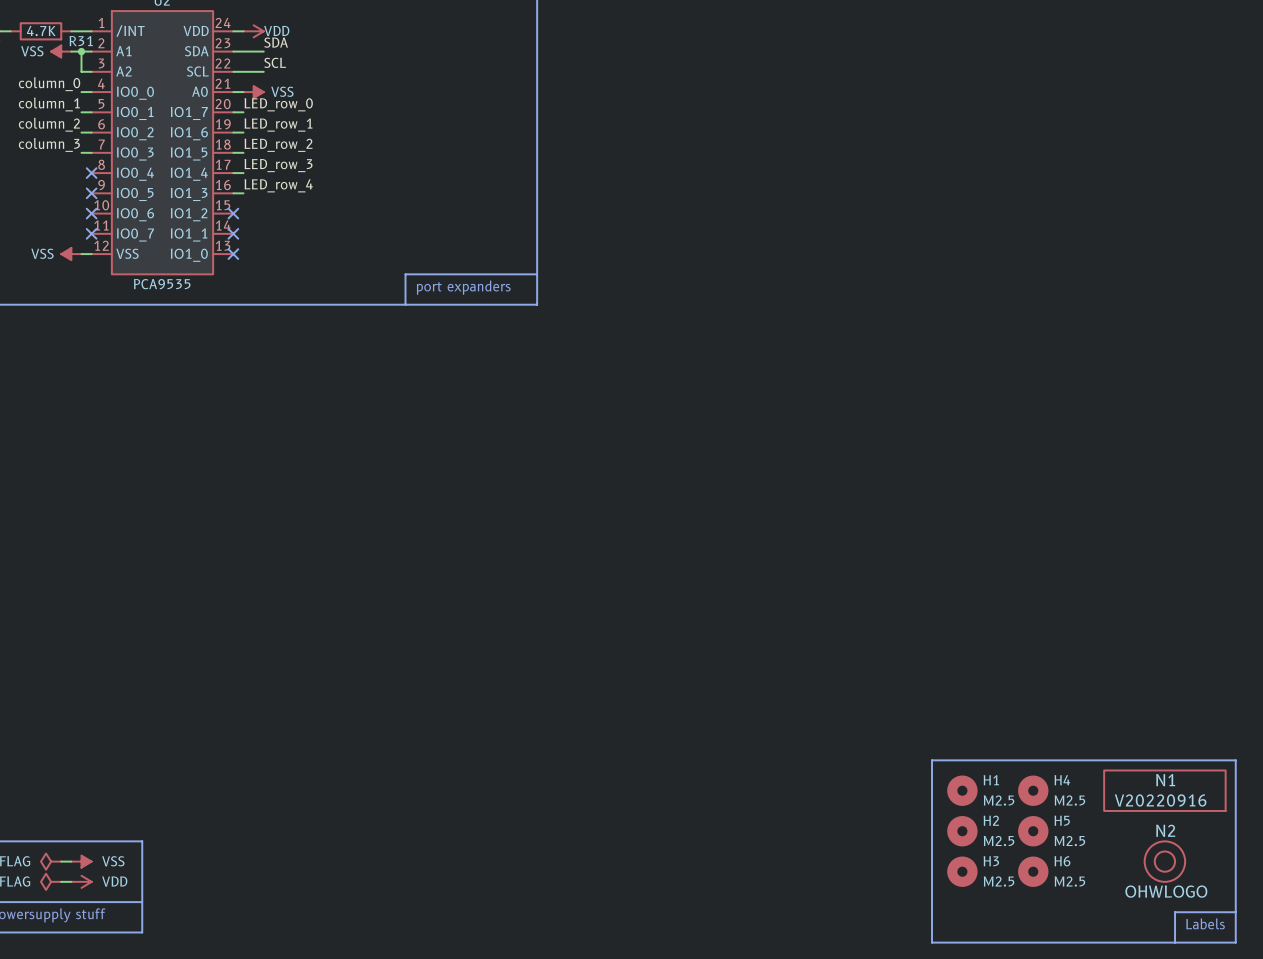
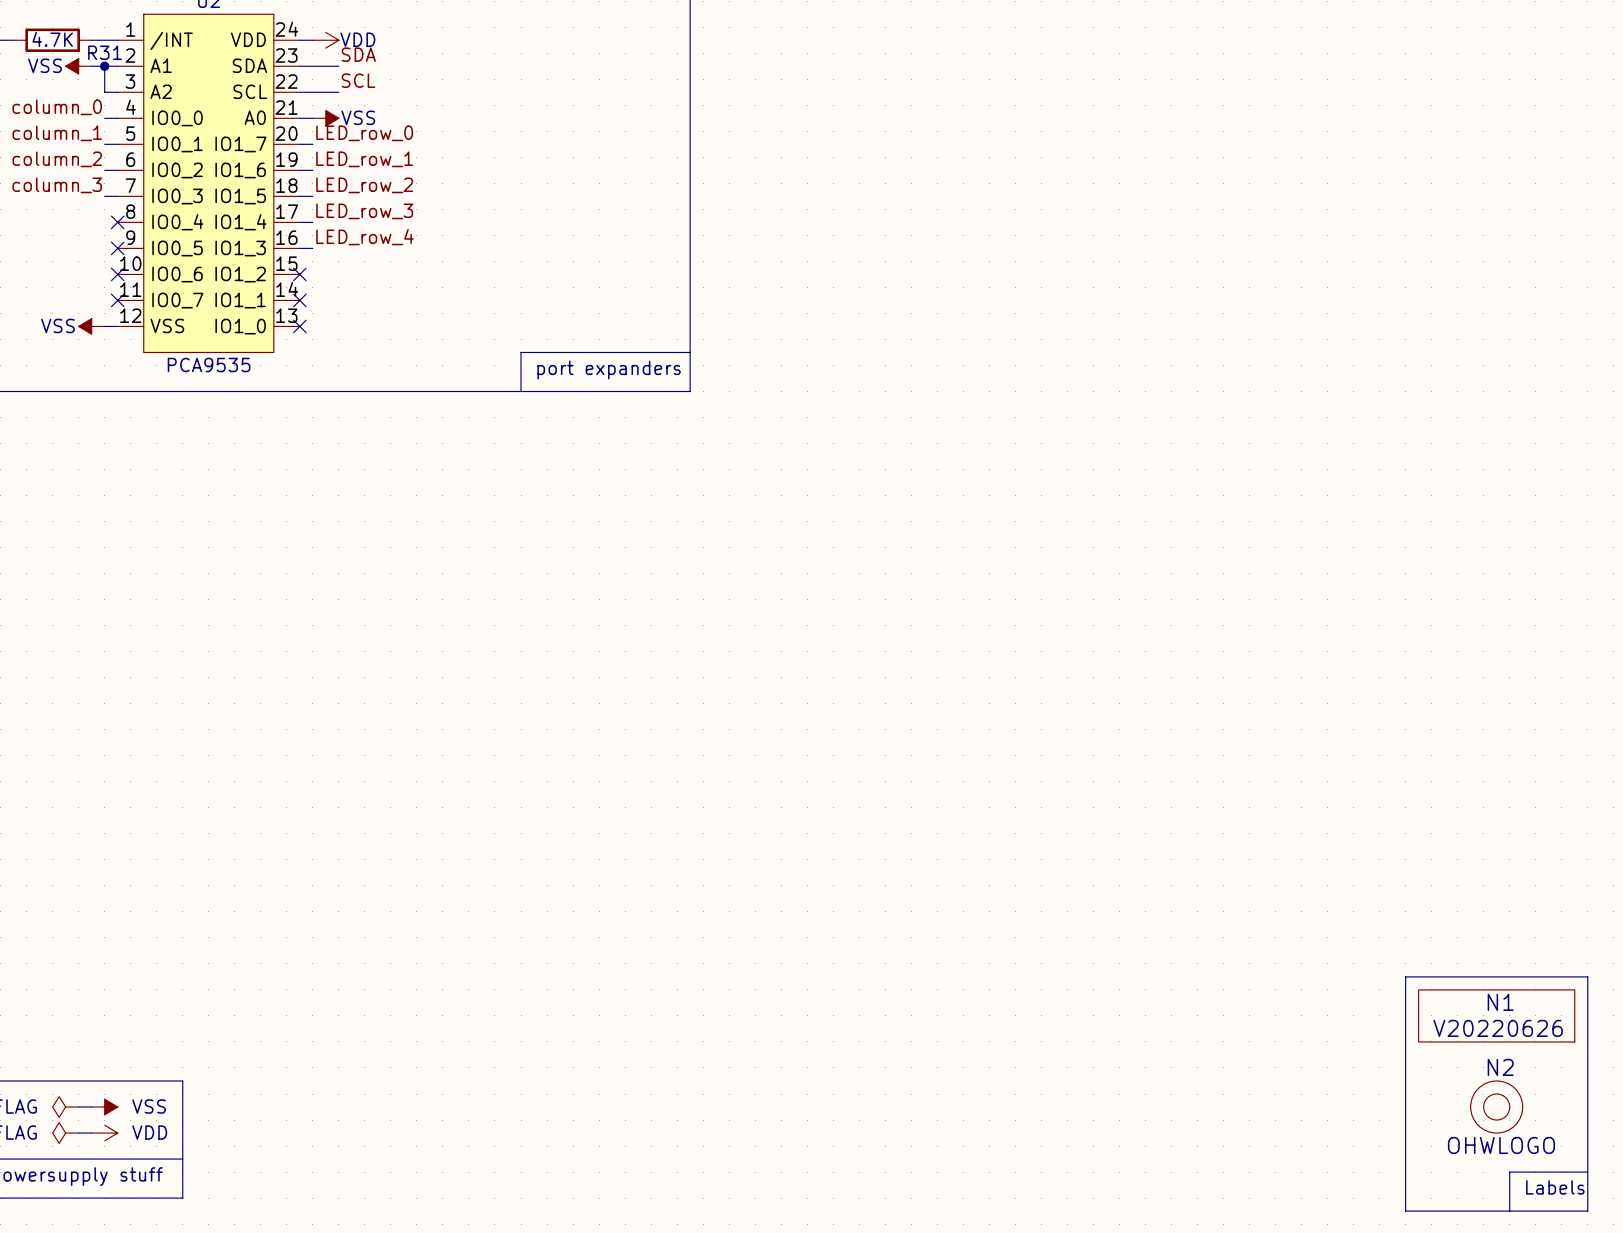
line: (1094, 760) (932, 760) (932, 942) (1094, 942) -> (1405, 976) (1405, 1211)
H1: M2.5 (962, 790) -> none
H4: M2.5 (1033, 790) -> none
N1 value: V20220916 (1160, 800) -> V20220626 (1498, 1028)
H2: M2.5 (962, 831) -> none
H5: M2.5 (1033, 831) -> none
H3: M2.5 (962, 871) -> none
H6: M2.5 (1033, 871) -> none

